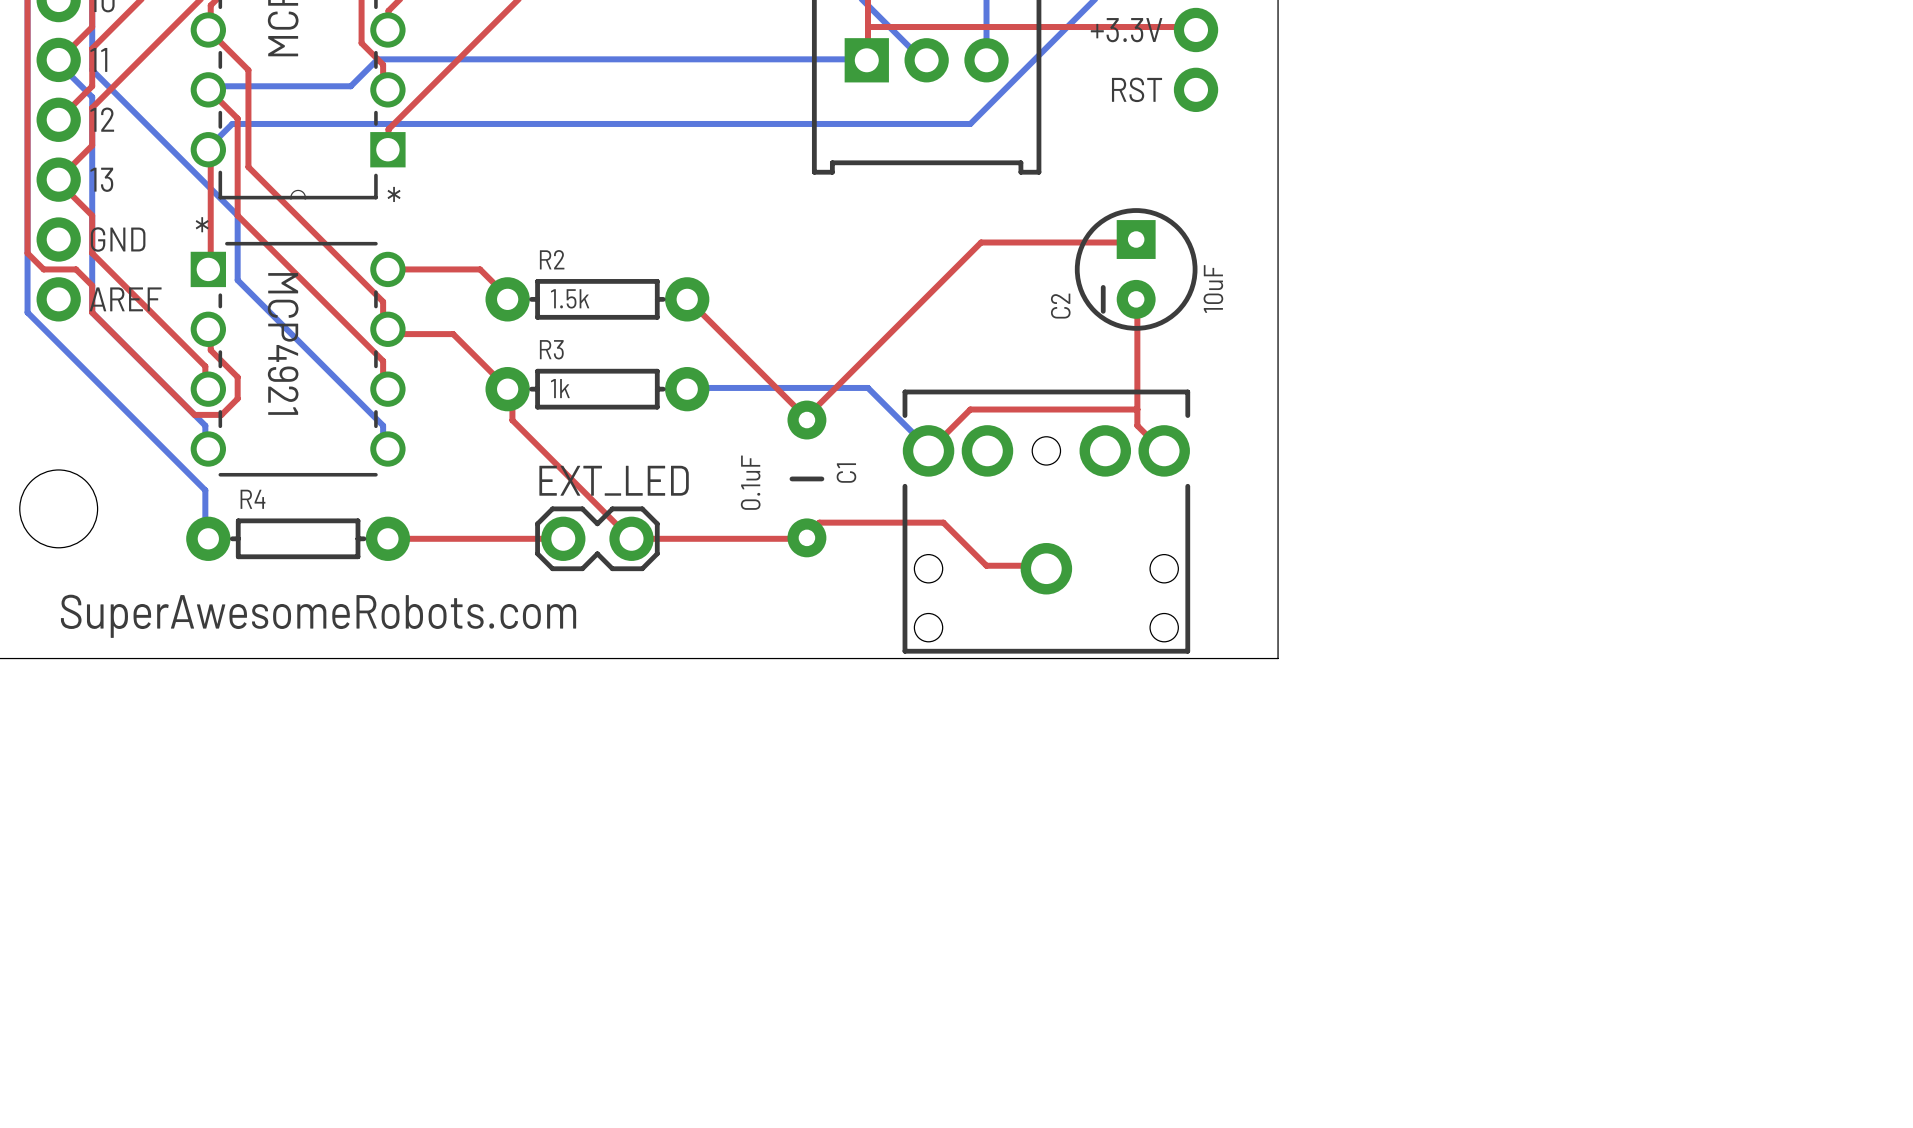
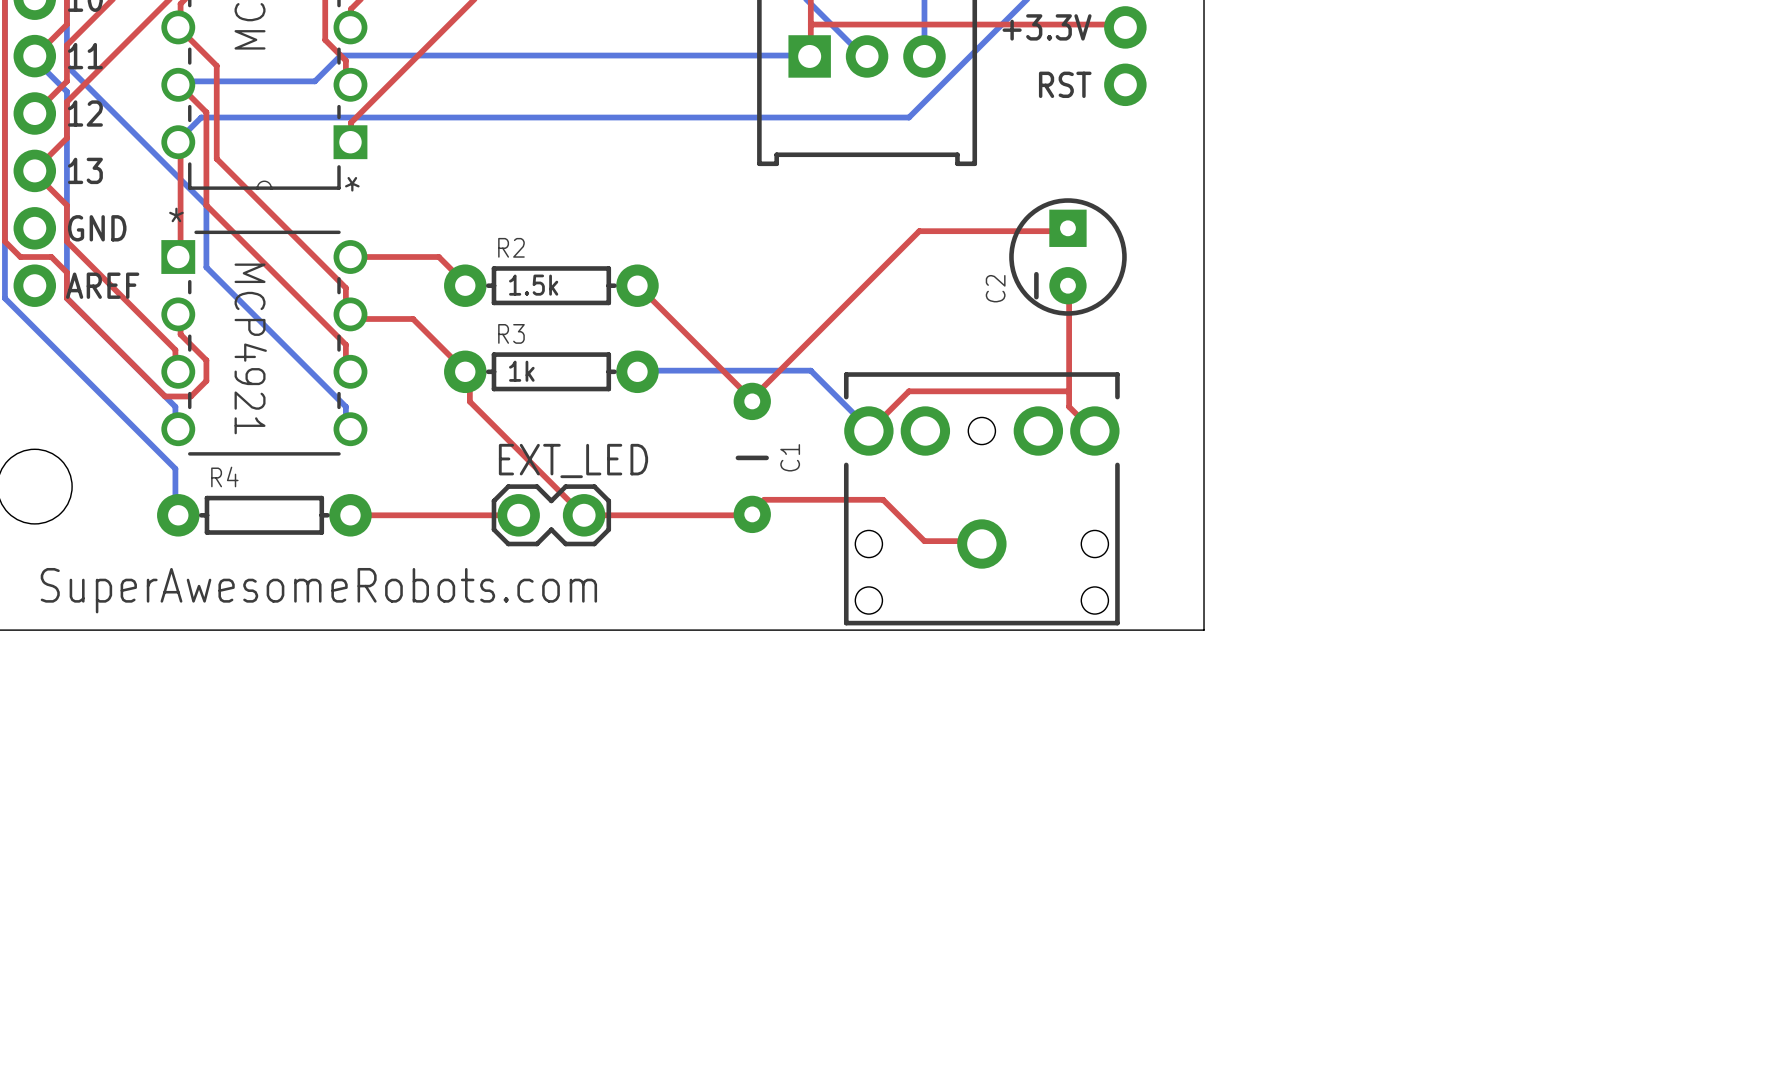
C2 value: 10uF (1213, 289) -> none
C1 value: 0.1uF (750, 482) -> none

